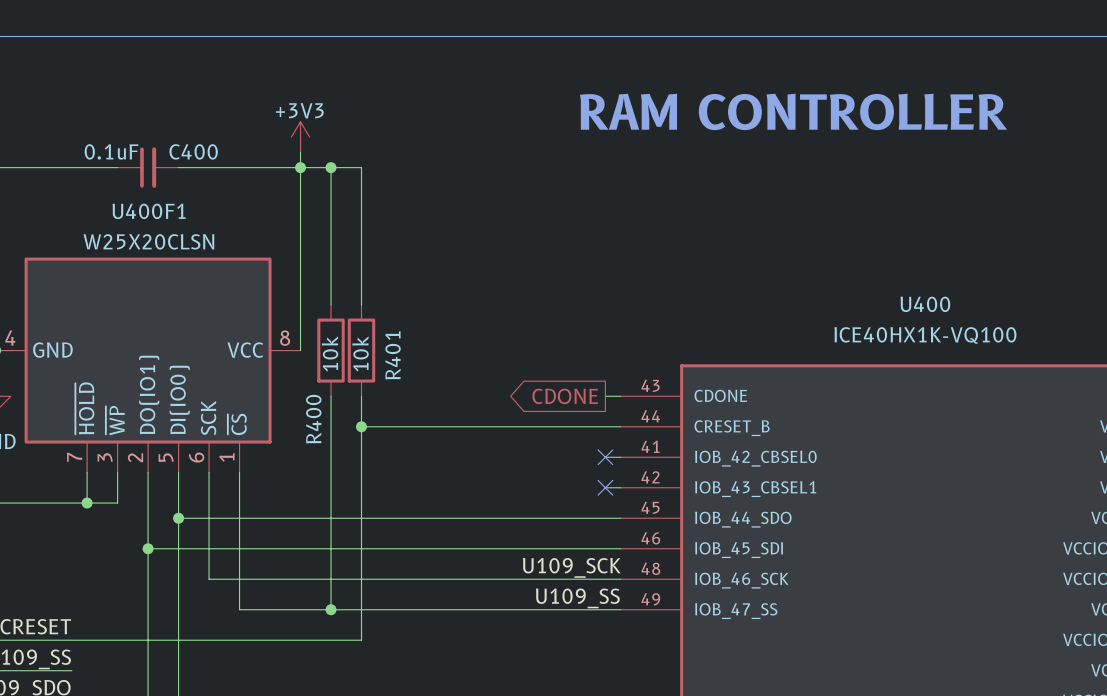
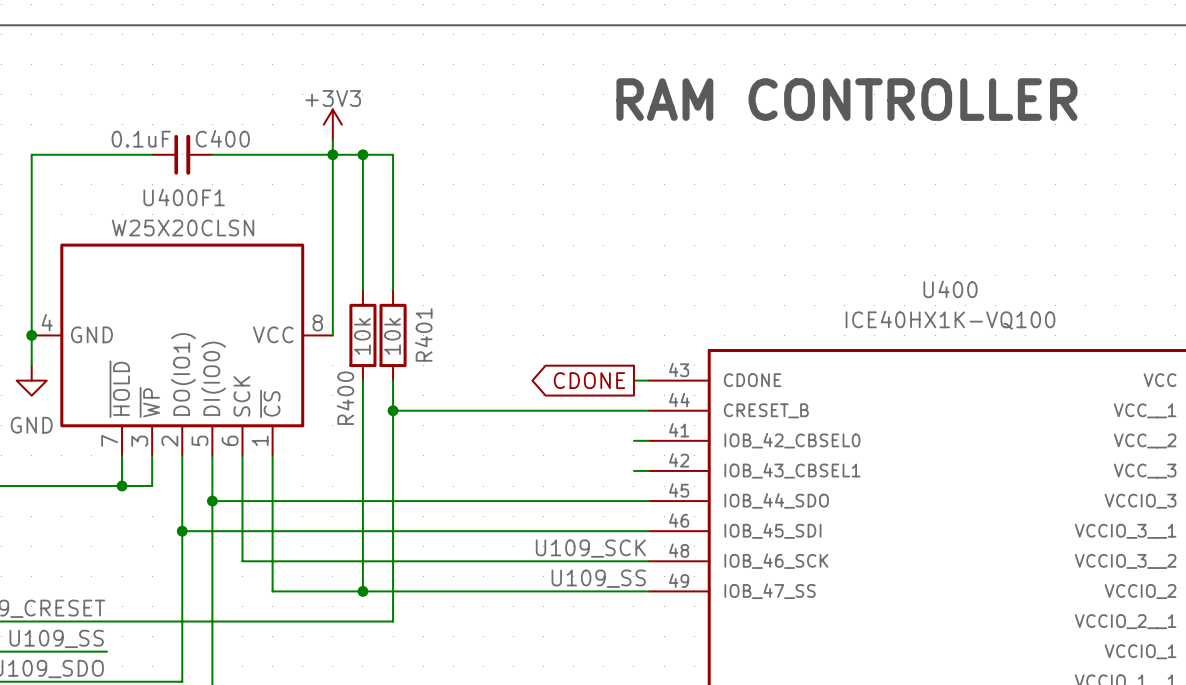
no-connect mark: (605, 457) -> none
no-connect mark: (605, 487) -> none

